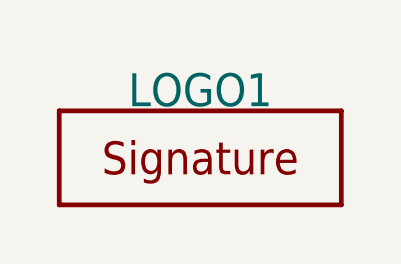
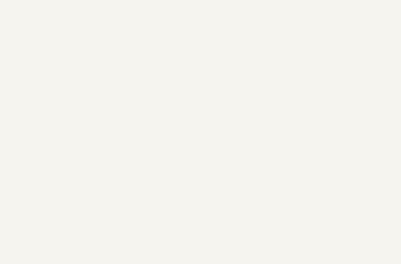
LOGO1: (200, 157) -> none

